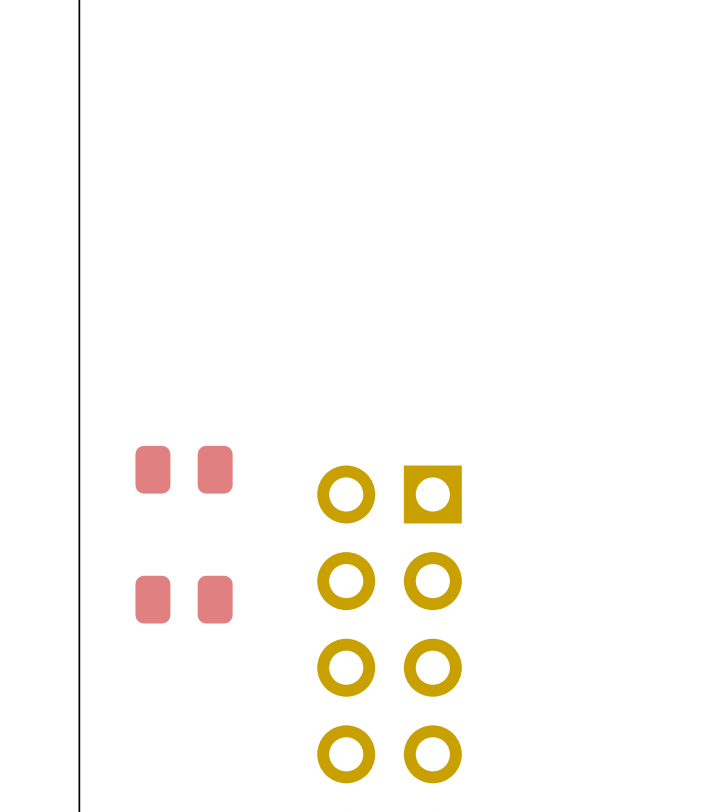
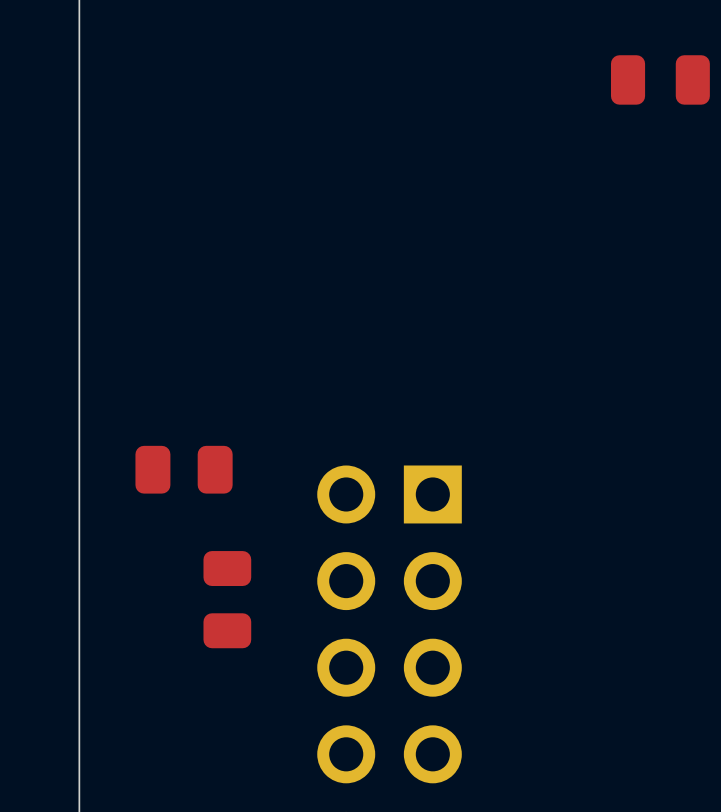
part: none -> (660, 79)
part rotation: 0° (184, 599) -> 90° clockwise (227, 599)

